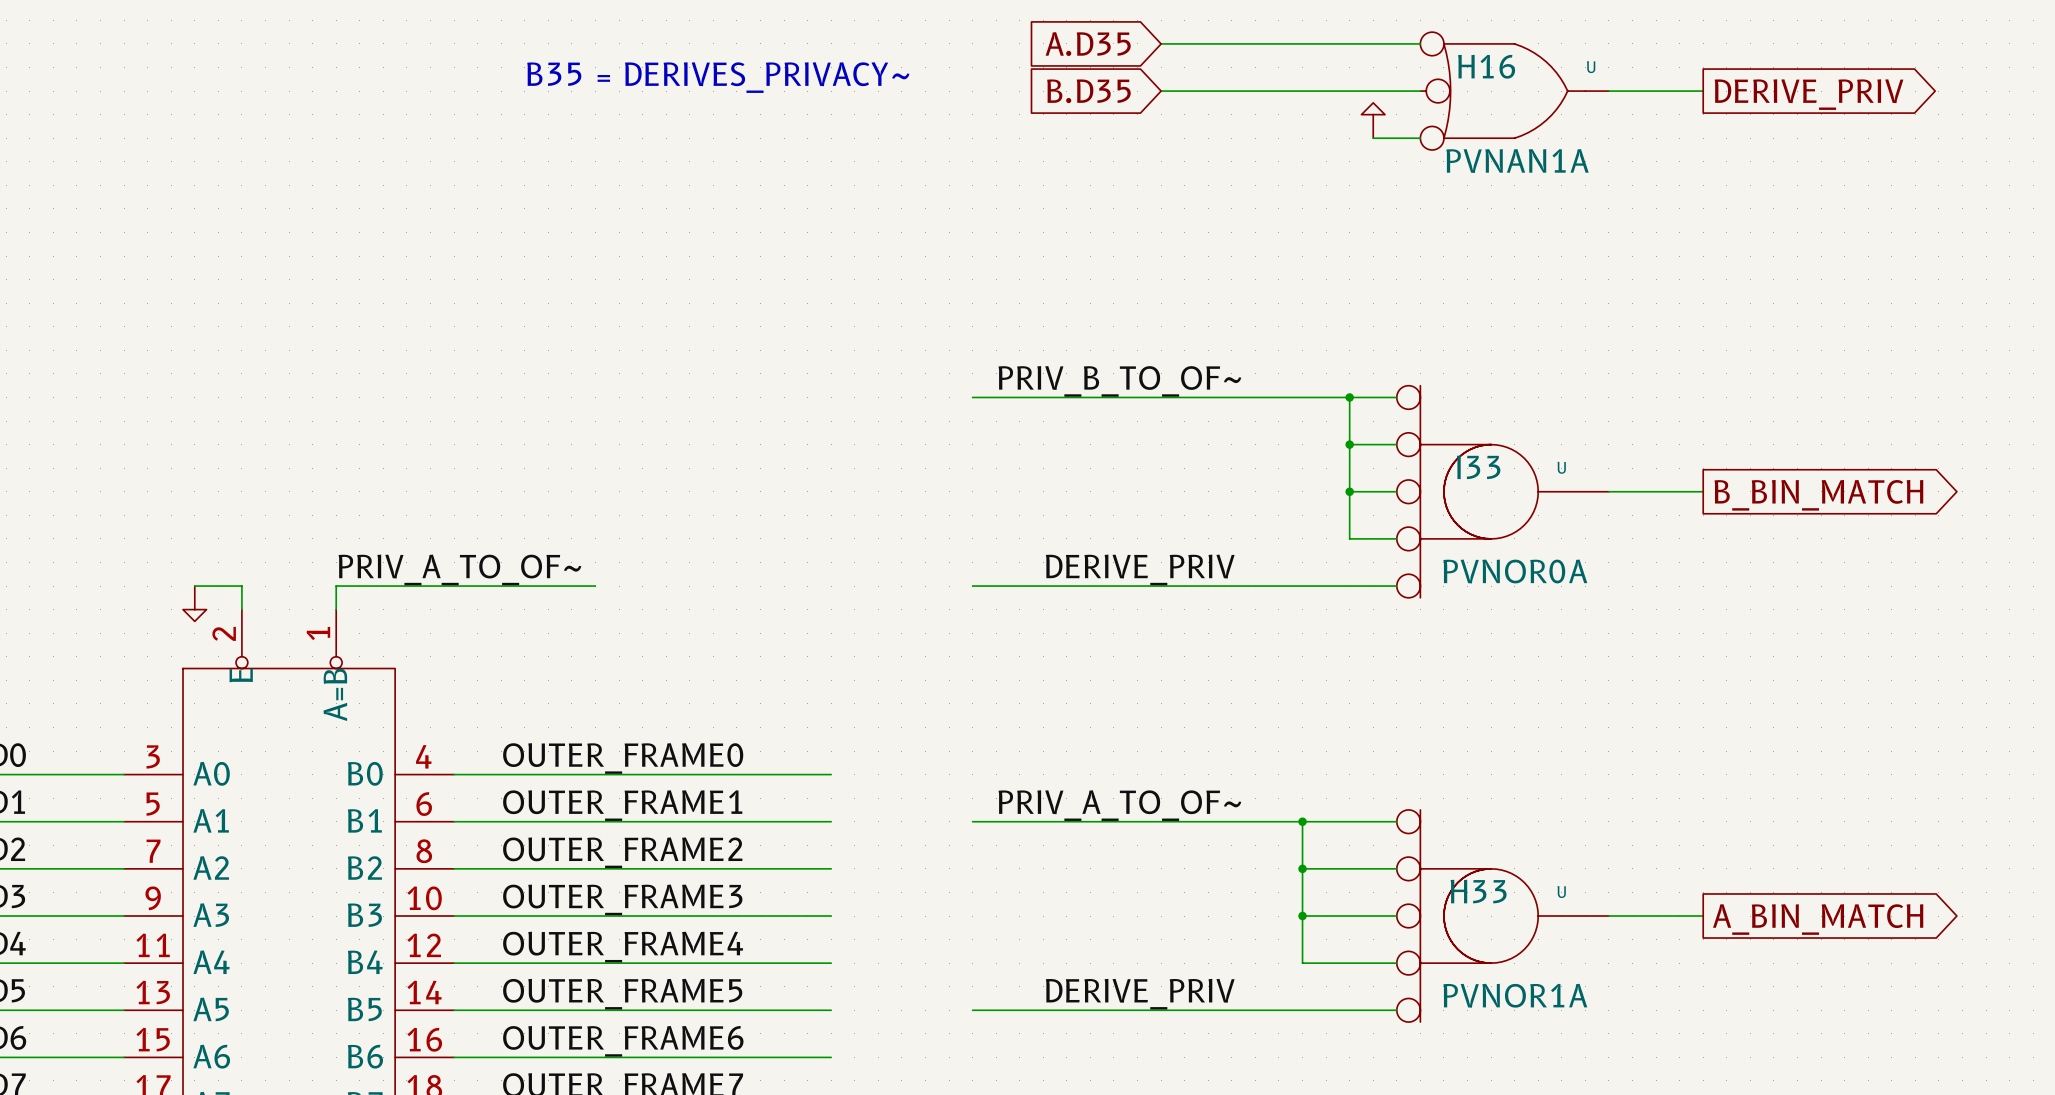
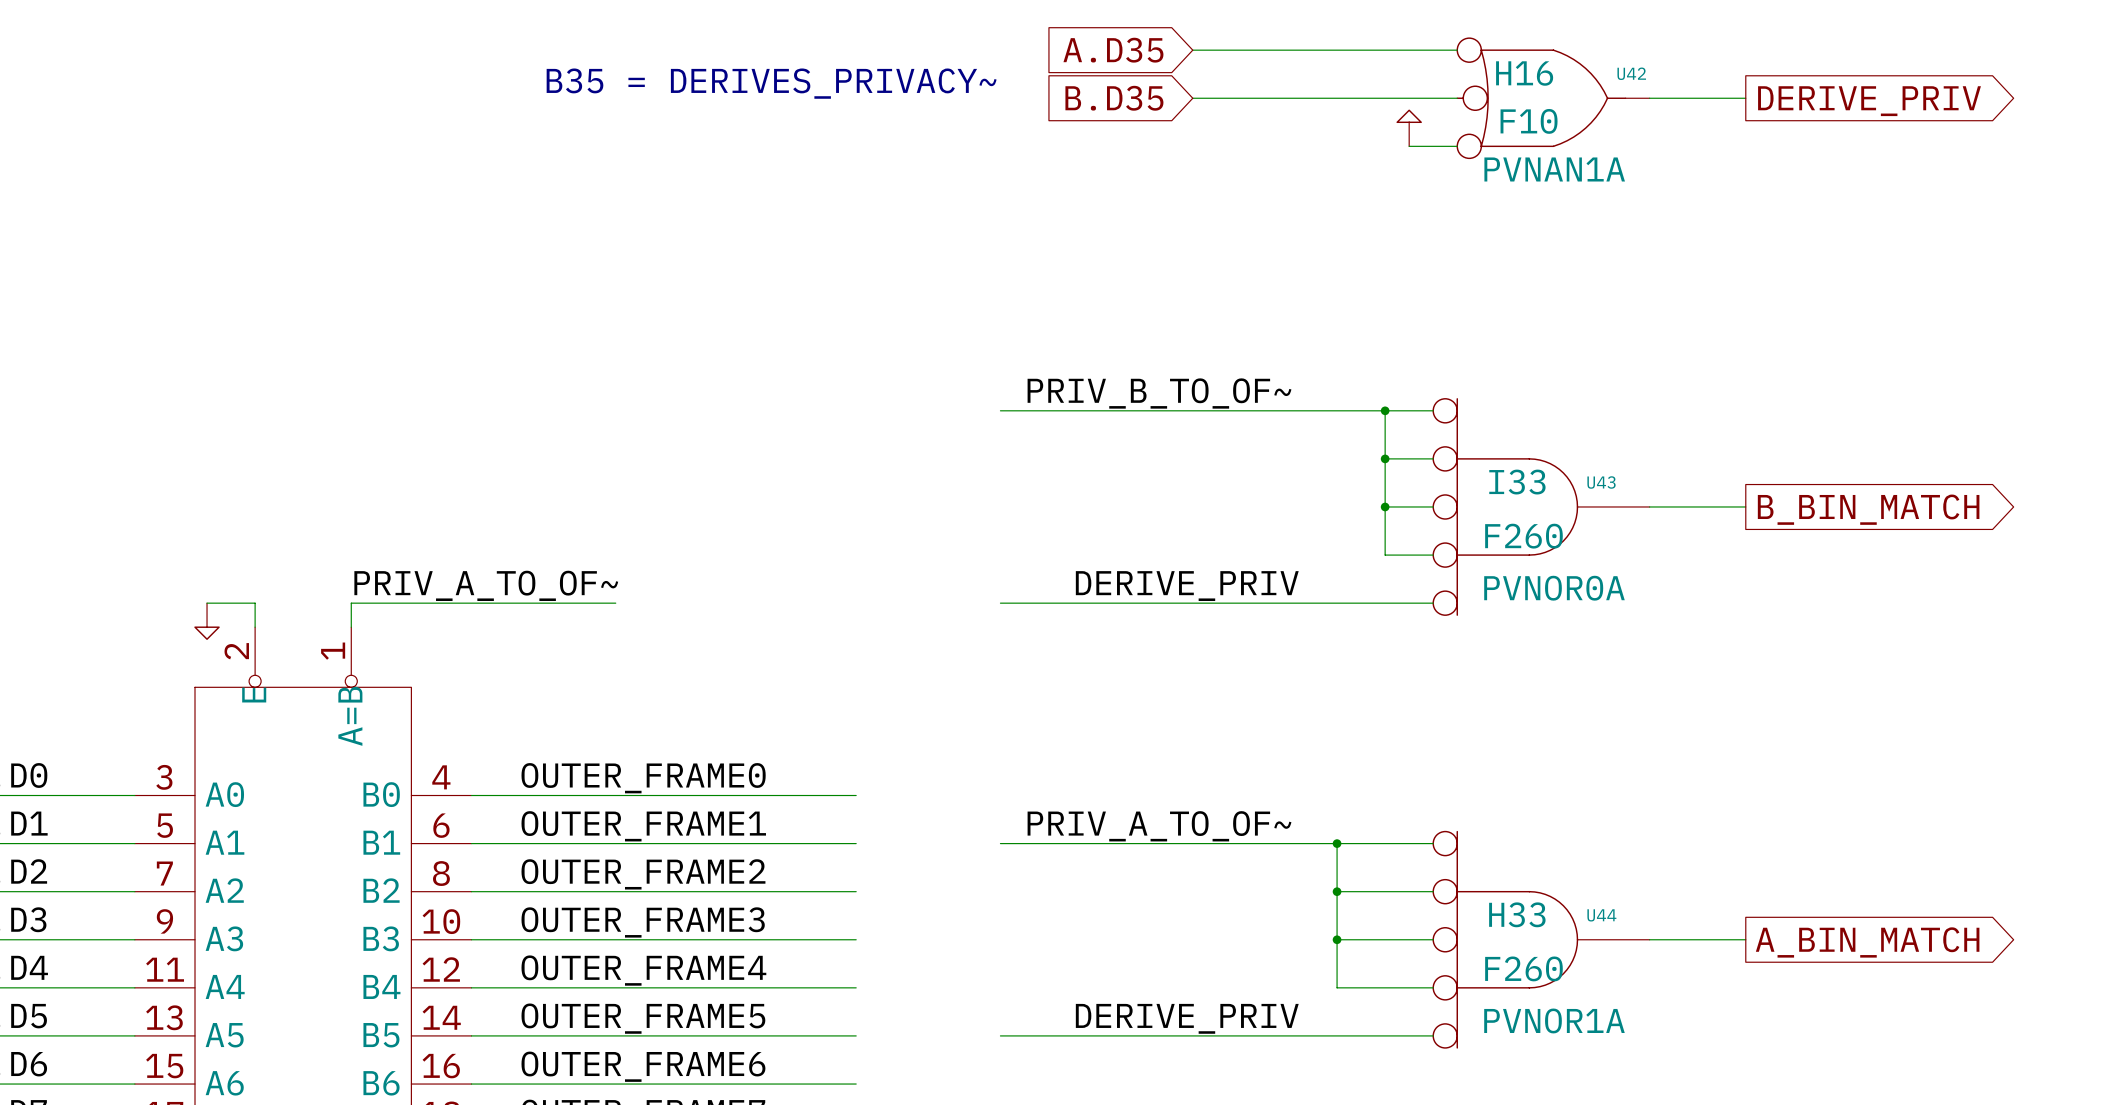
U name: U (1591, 67) -> U42 (1631, 73)
U value: none -> F10 (1529, 121)
U: (1502, 491) -> none
U43: none -> F260 (1541, 506)
U: (1502, 916) -> none
U44: none -> F260 (1541, 939)

